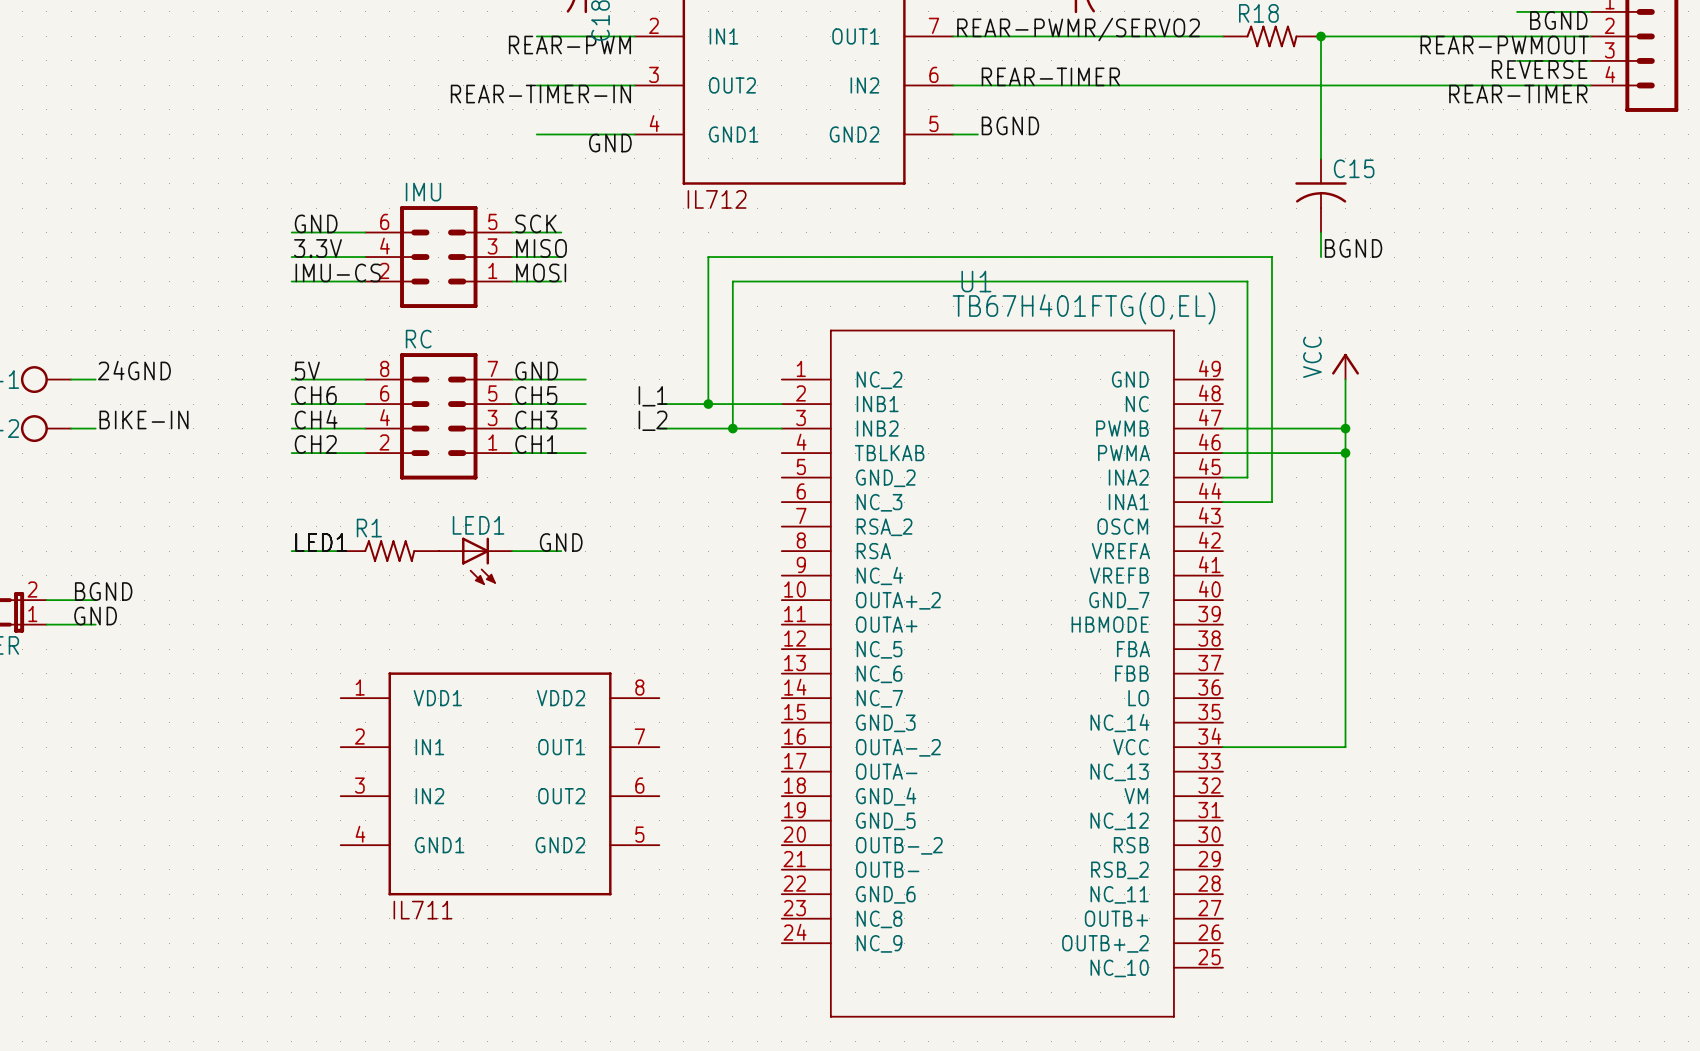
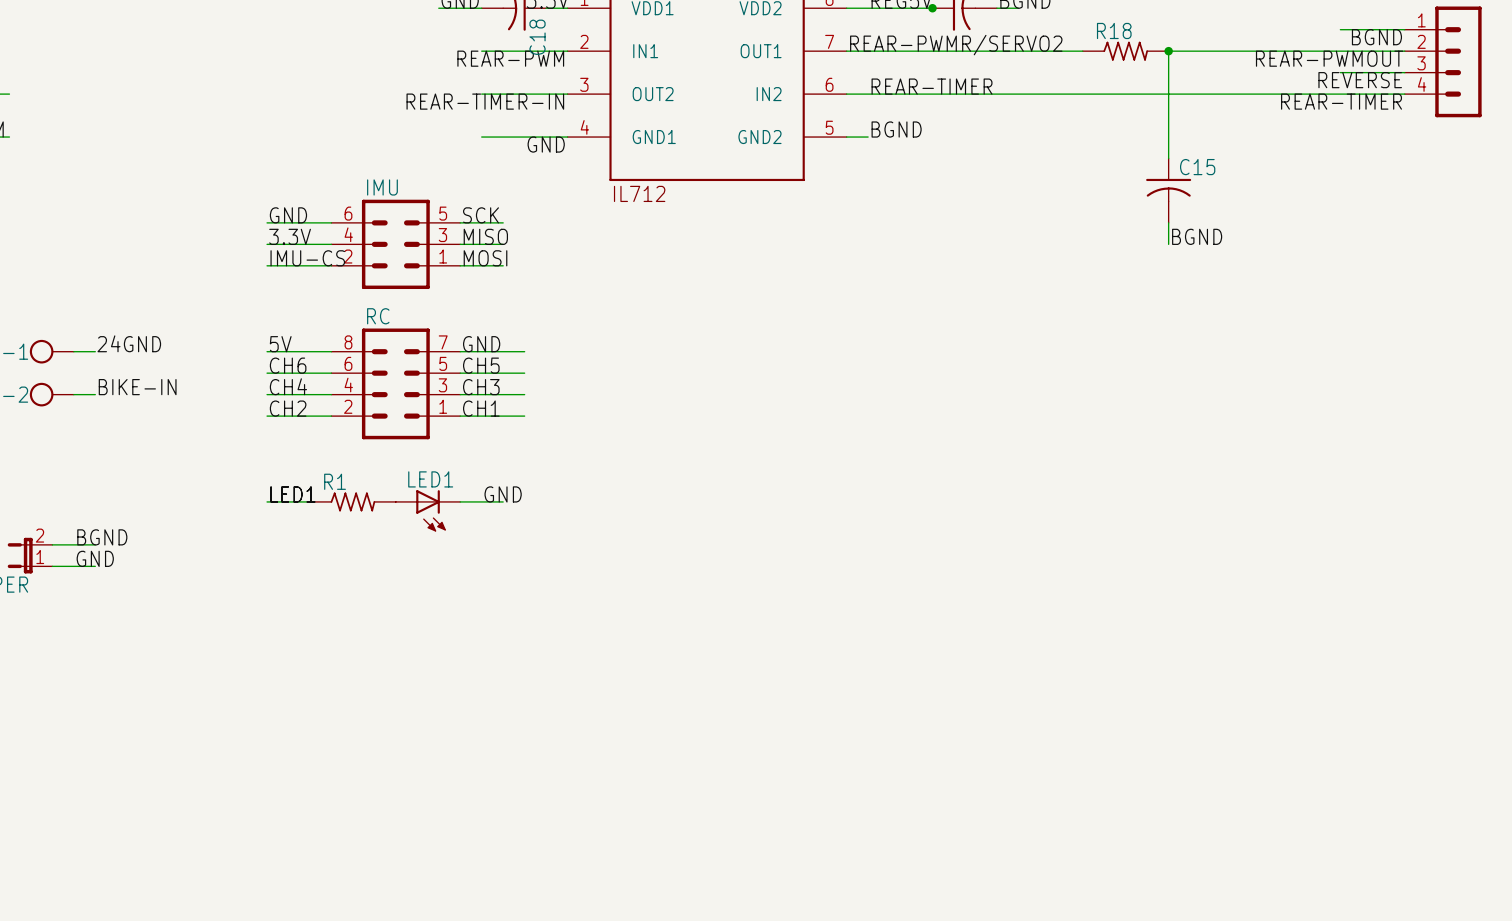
power symbol: VCC (1345, 366) -> none
wire: (1345, 379) (1345, 747) (1222, 747) -> none
label: I_1 (652, 396) -> none
wire: (659, 404) (781, 404) -> none
wire: (708, 404) (708, 257) (1271, 257) (1271, 502) (1222, 502) -> none
junction: (708, 404) -> none
label: I_2 (652, 420) -> none
wire: (659, 428) (781, 428) -> none
wire: (732, 428) (732, 281) (1247, 281) (1247, 477) (1222, 477) -> none
junction: (732, 428) -> none
wire: (1222, 428) (1345, 428) -> none
junction: (1345, 428) -> none
wire: (1222, 453) (1345, 453) -> none
junction: (1345, 453) -> none
U1: TB67H401FTG(O,EL) (1002, 673) -> none
part: (500, 783) -> none

